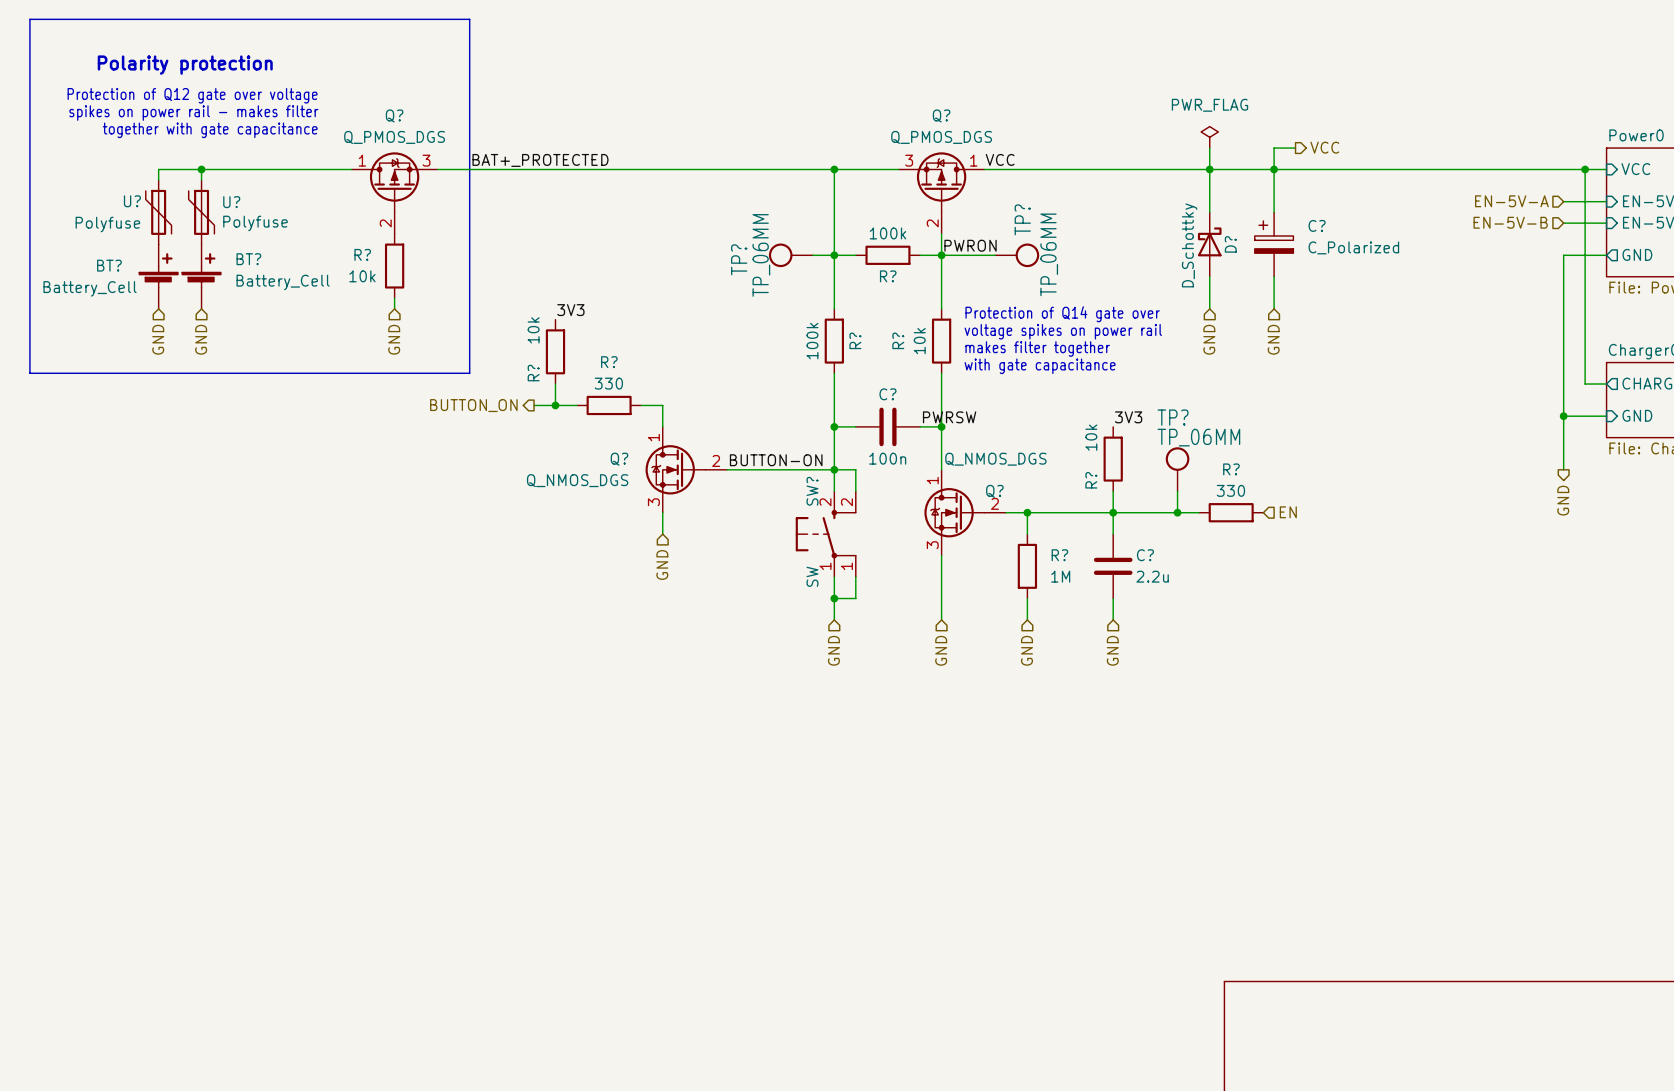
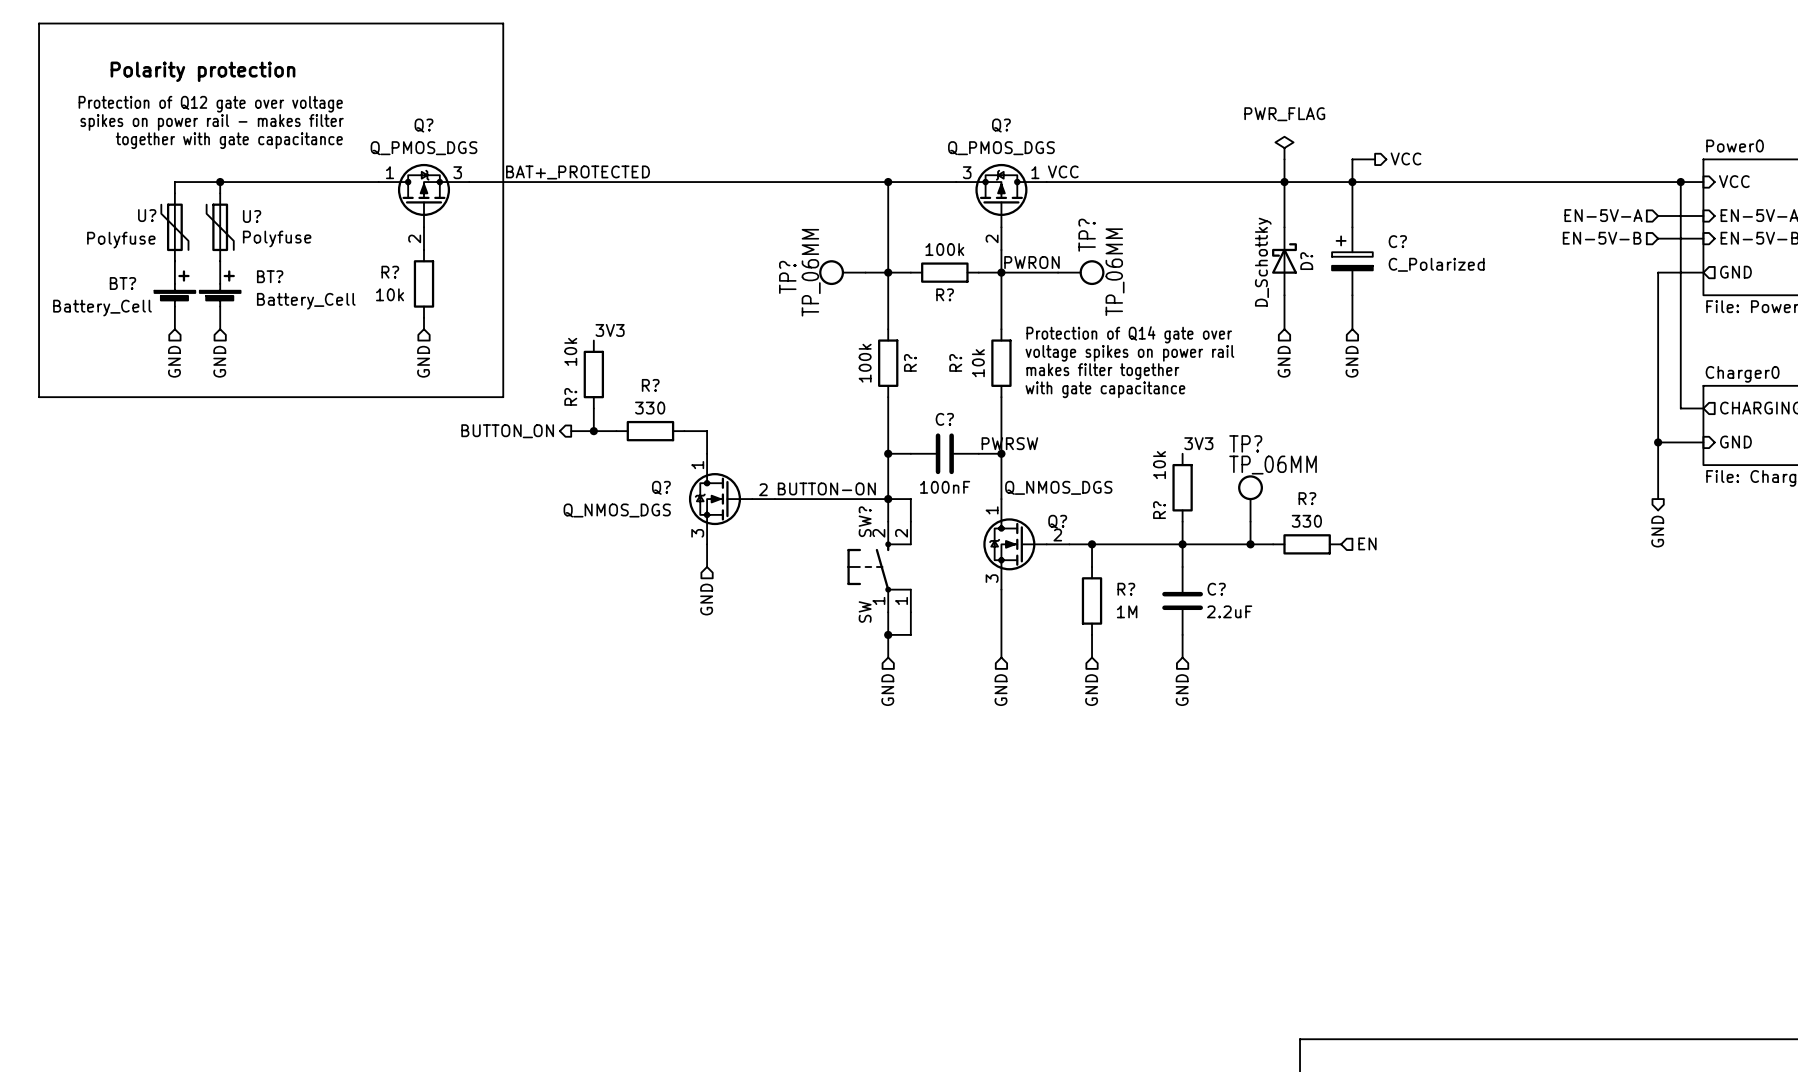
C? value: 100n (887, 458) -> 100nF (945, 487)
C? value: 2.2u (1152, 576) -> 2.2uF (1229, 611)

